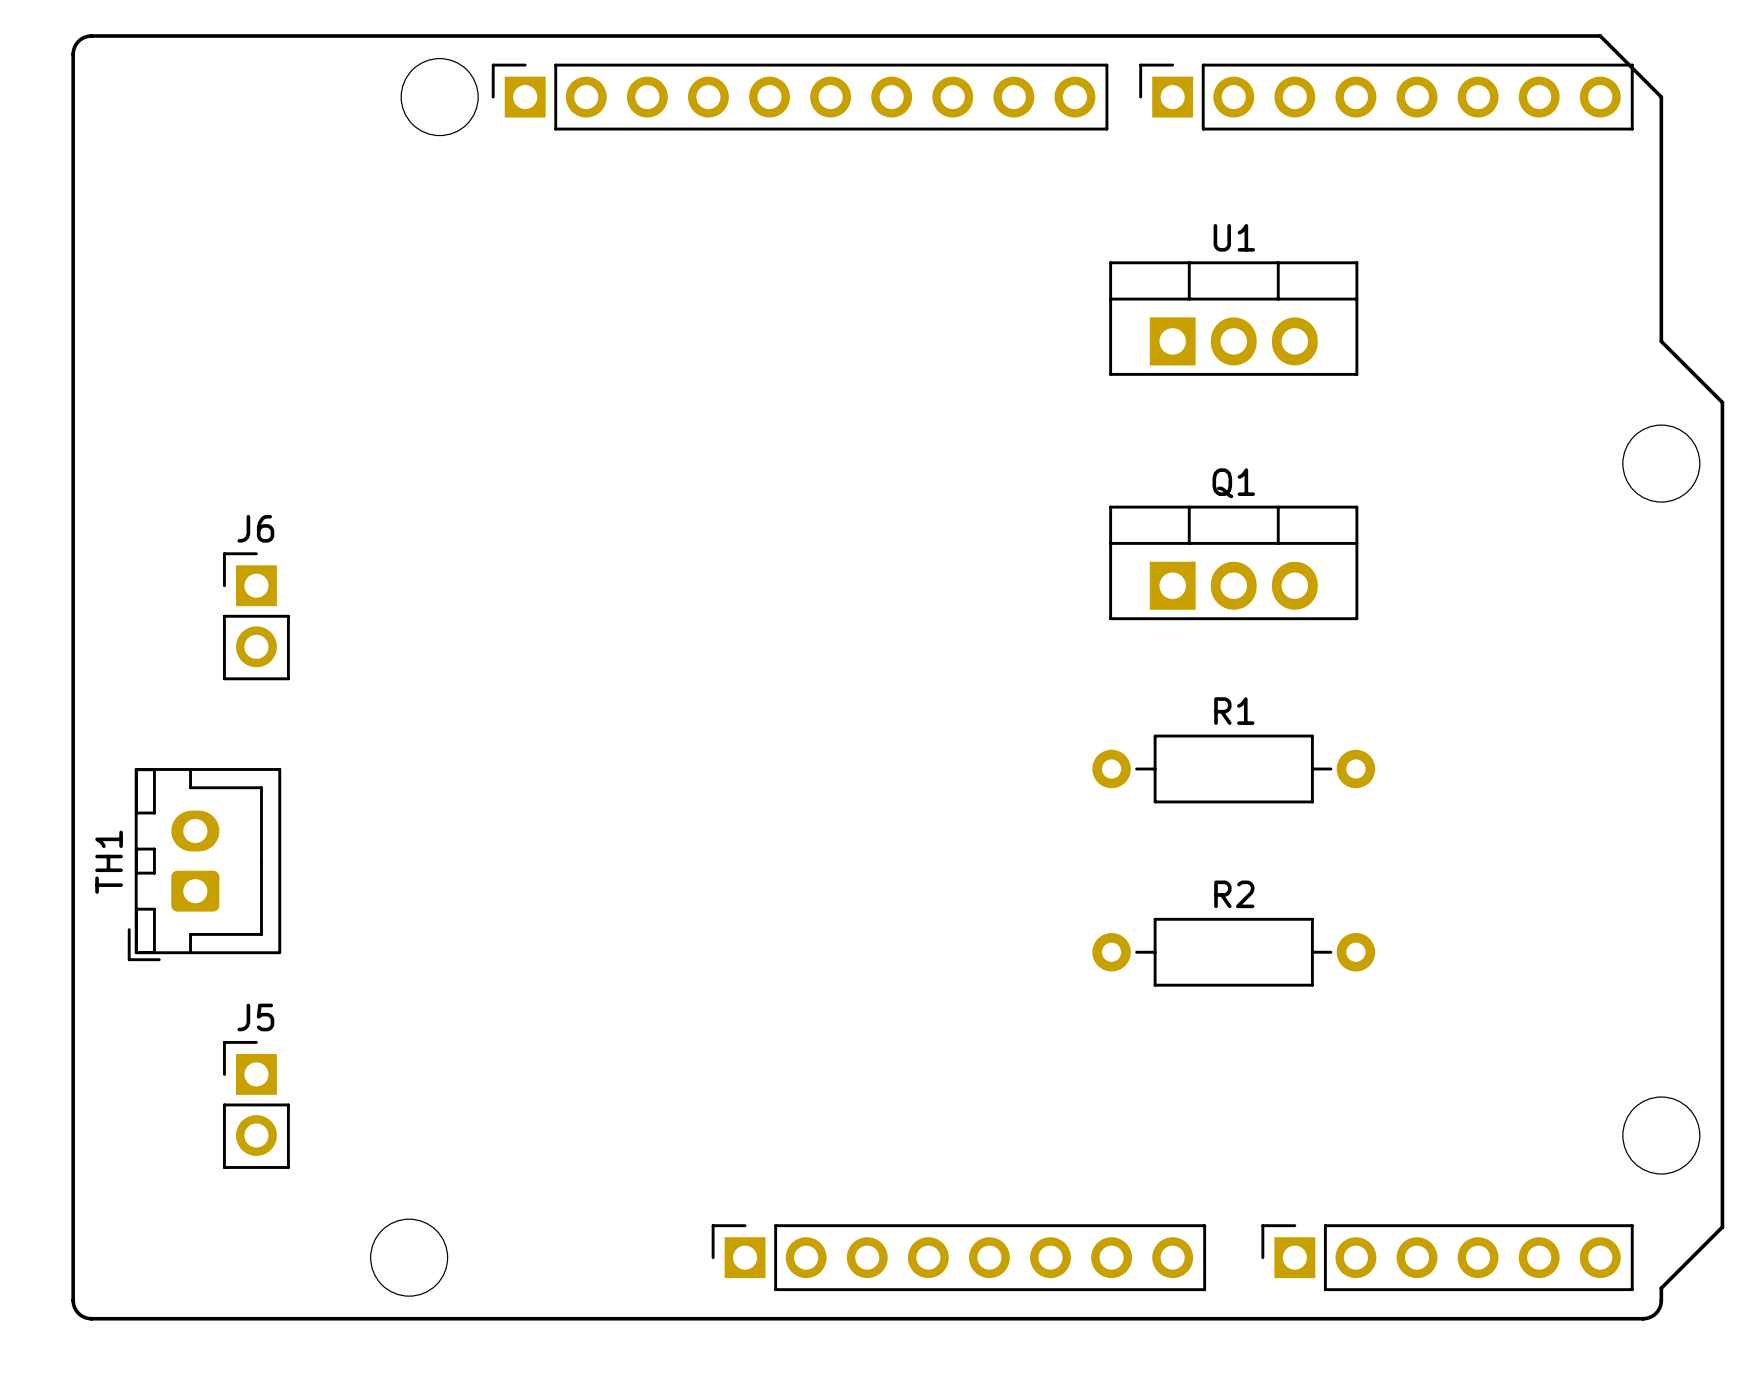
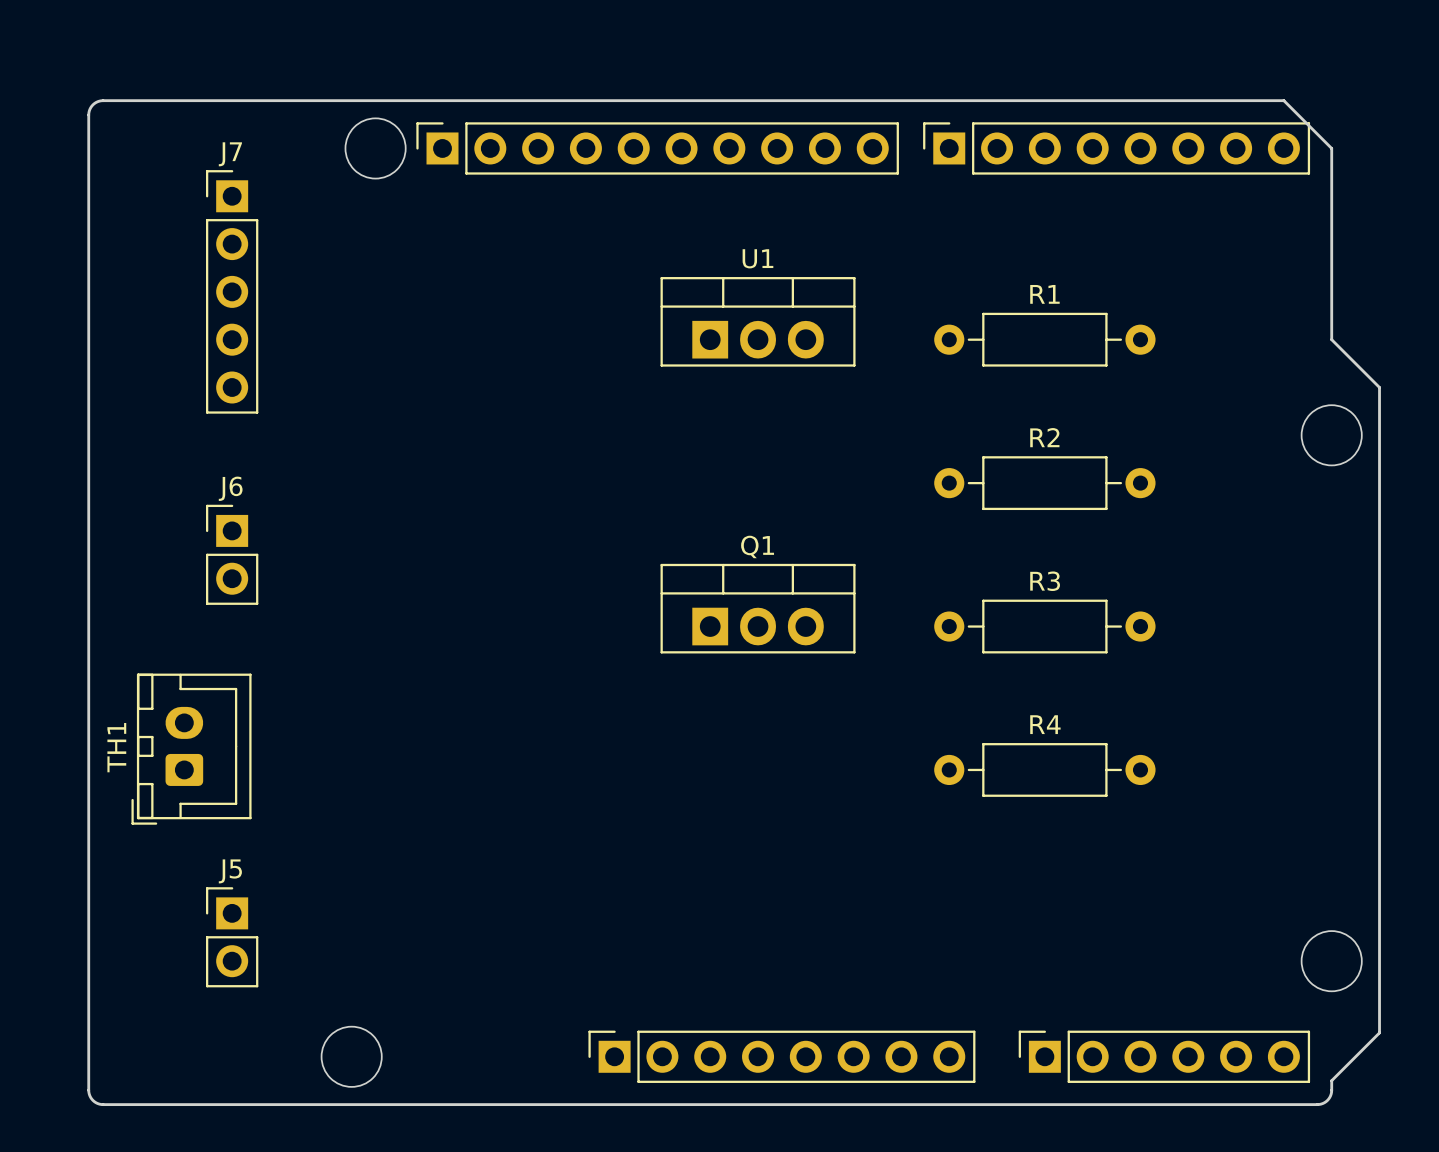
J7: none -> (232, 291)
U1 position: (1233, 318) -> (758, 321)
Q1 position: (1233, 562) -> (758, 608)
R3: none -> (1044, 626)
R1 position: (1233, 768) -> (1044, 339)
R4: none -> (1044, 769)
R2 position: (1233, 952) -> (1044, 483)

